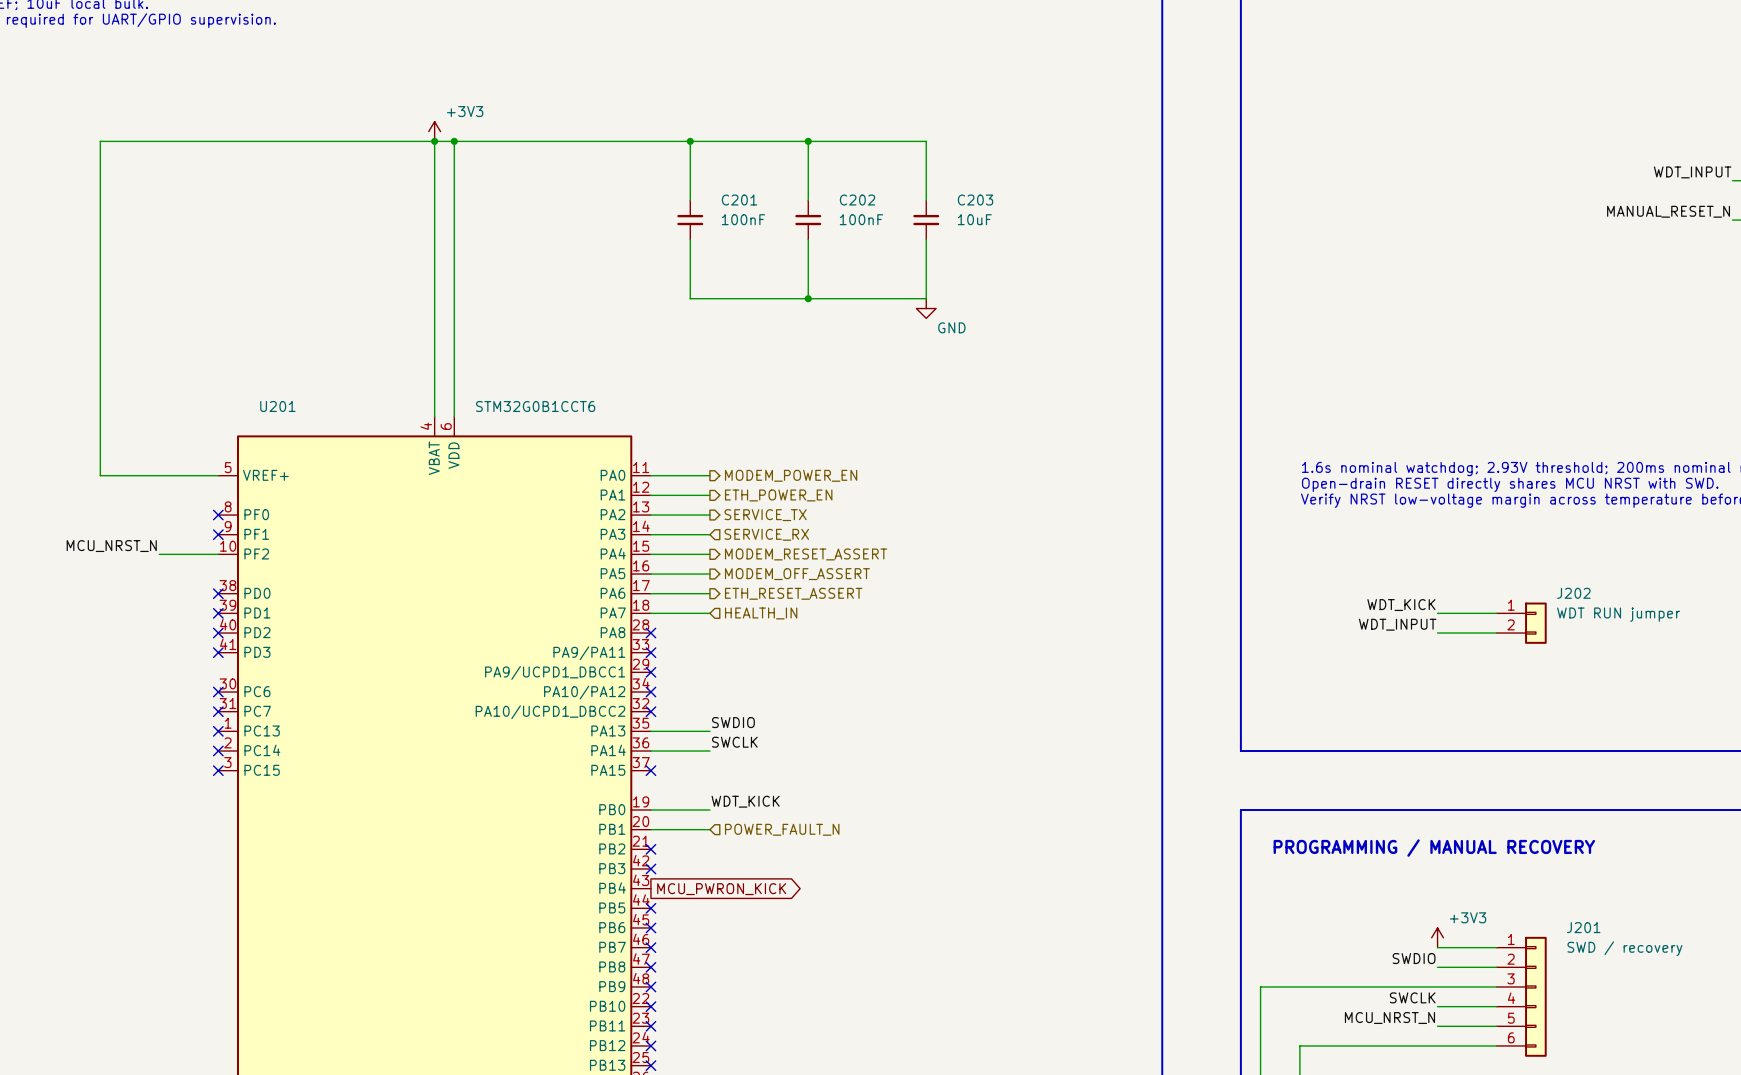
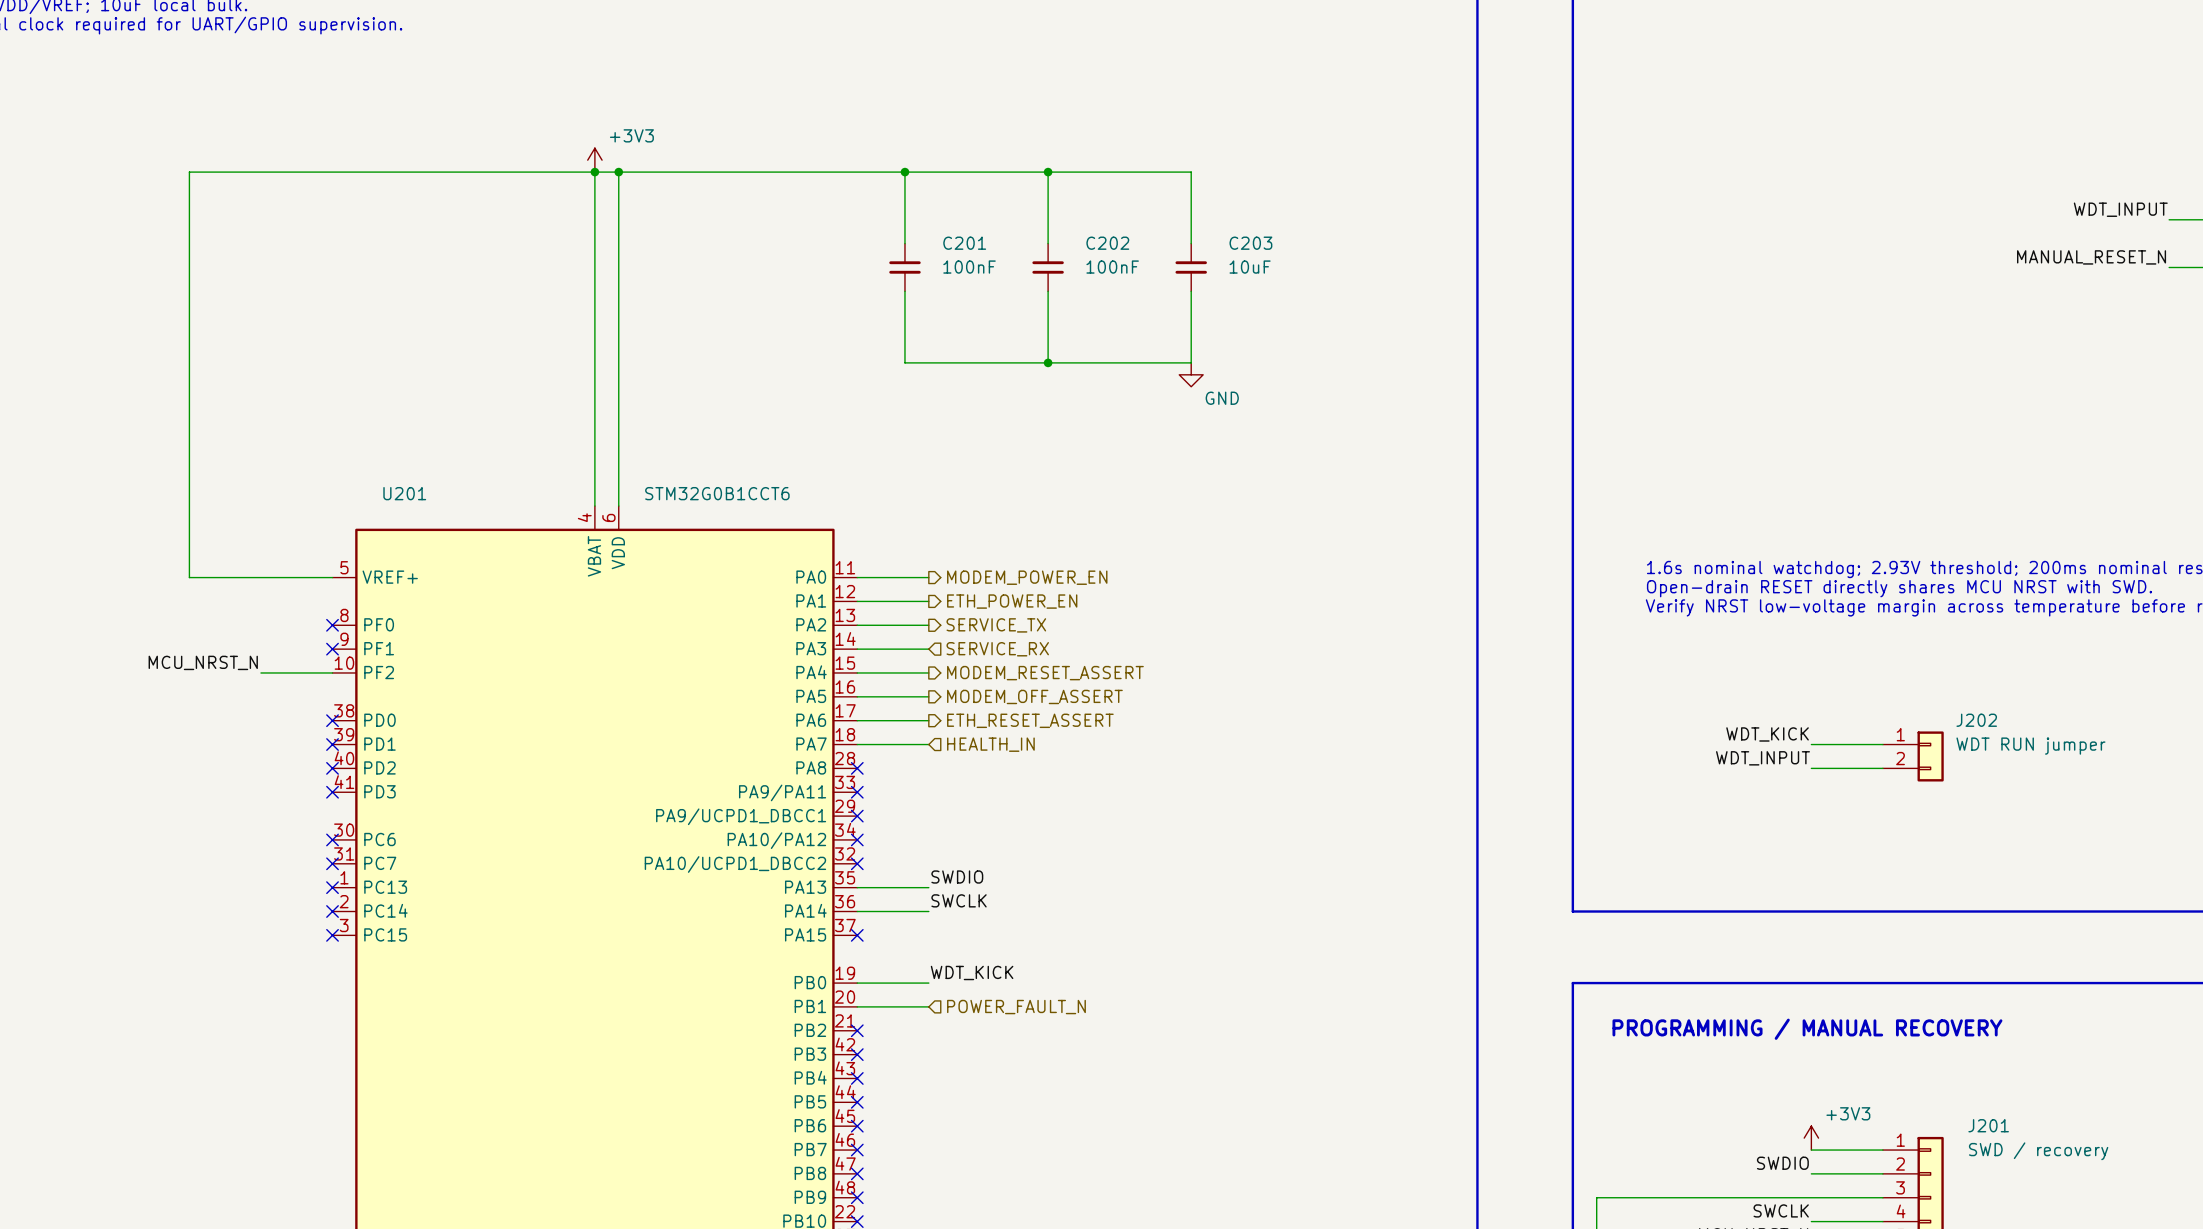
no-connect mark: none -> (857, 1078)
global label: MCU_PWRON_KICK (721, 889) -> none

